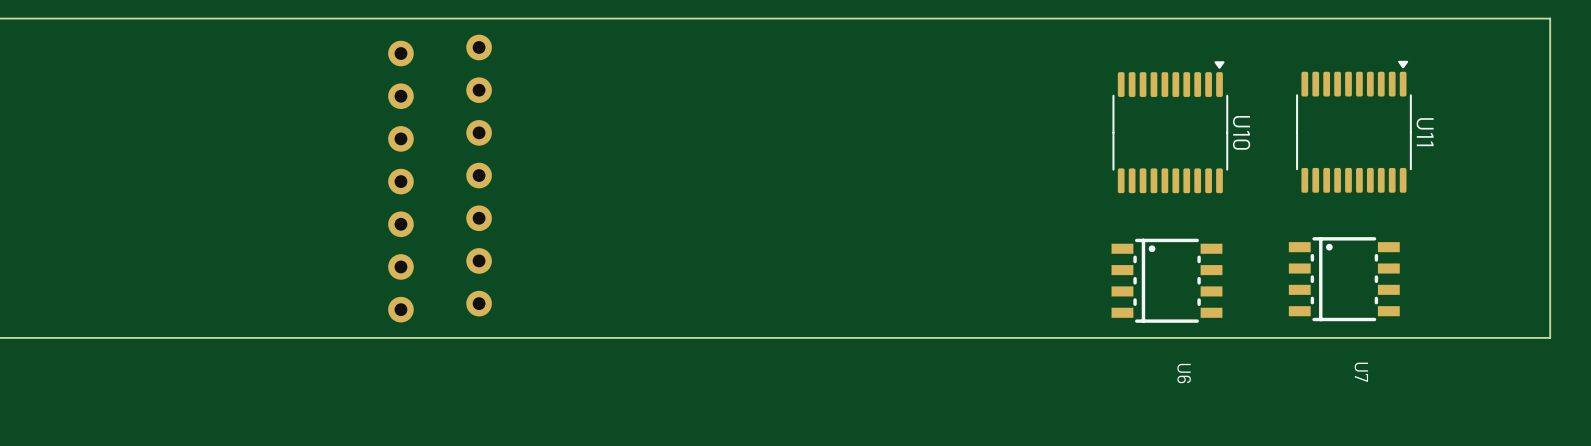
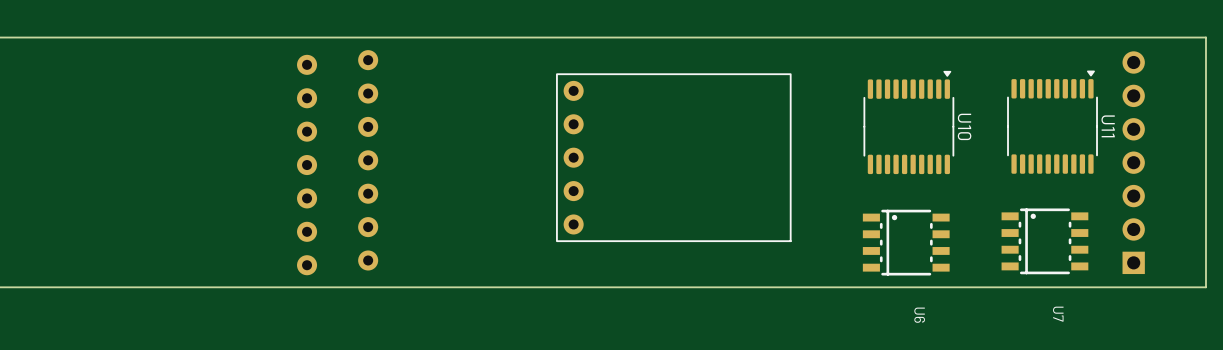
part: none -> (673, 157)
part: none -> (1133, 162)

